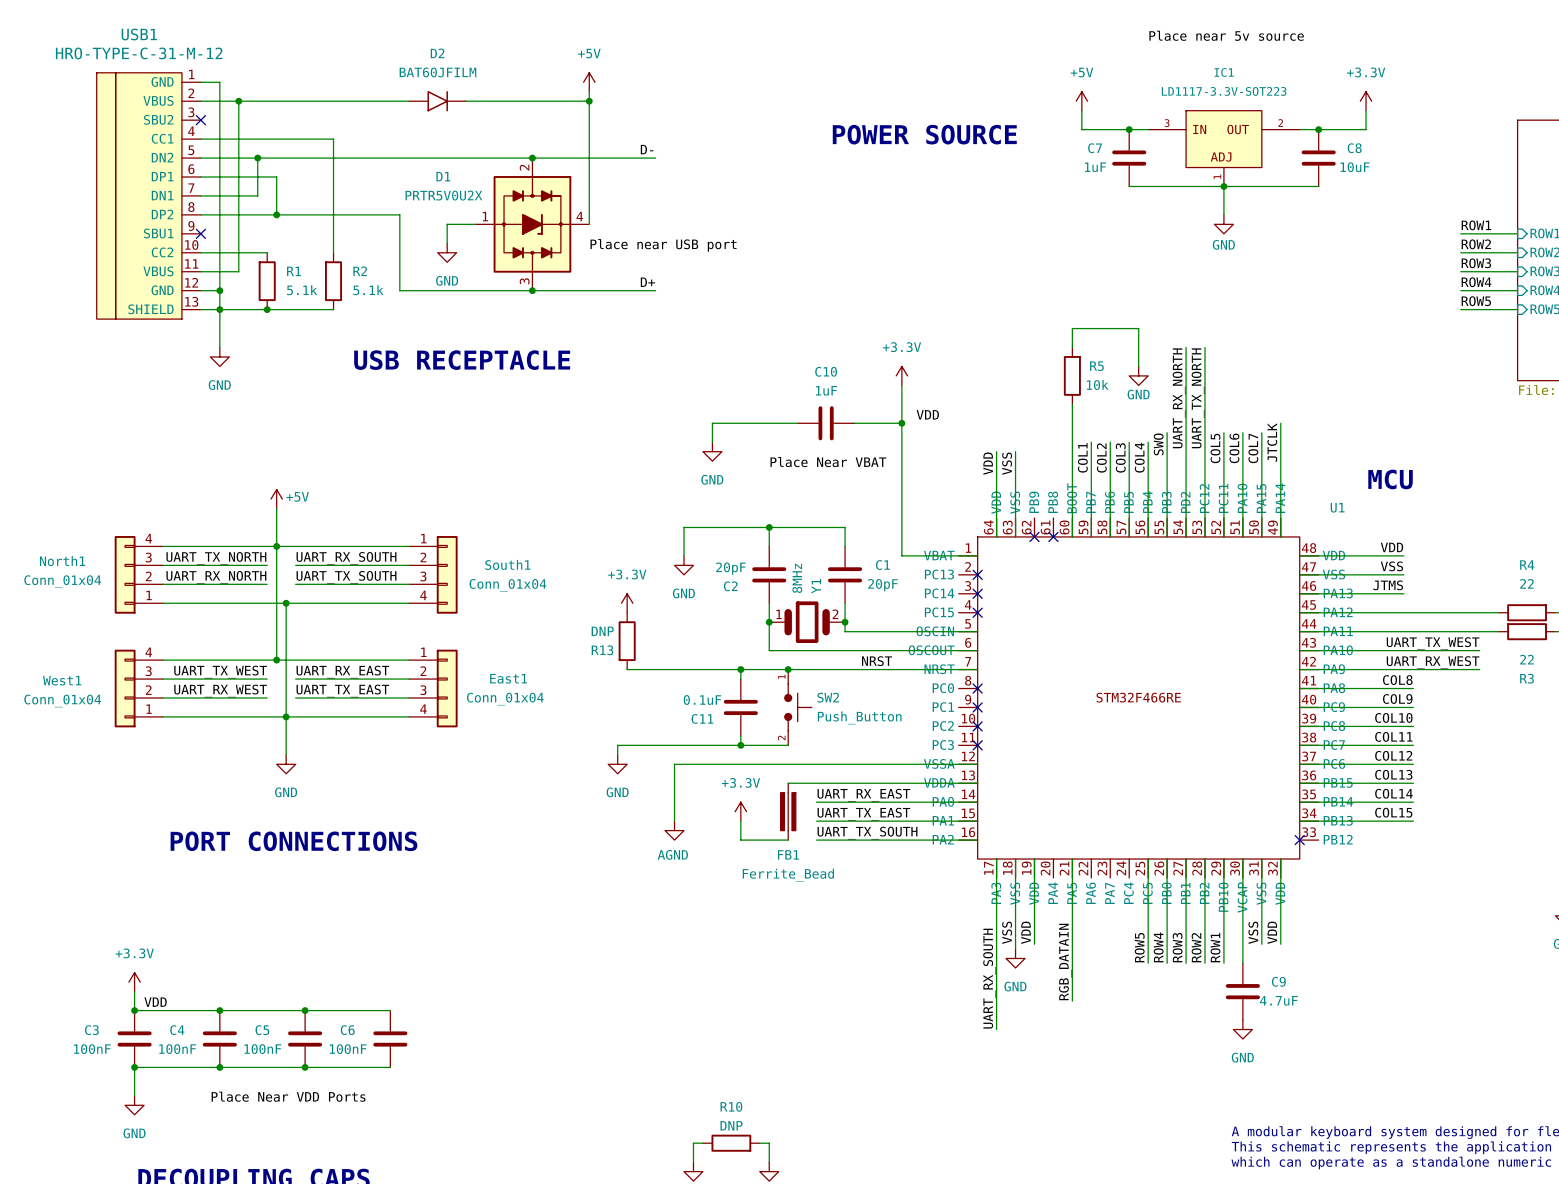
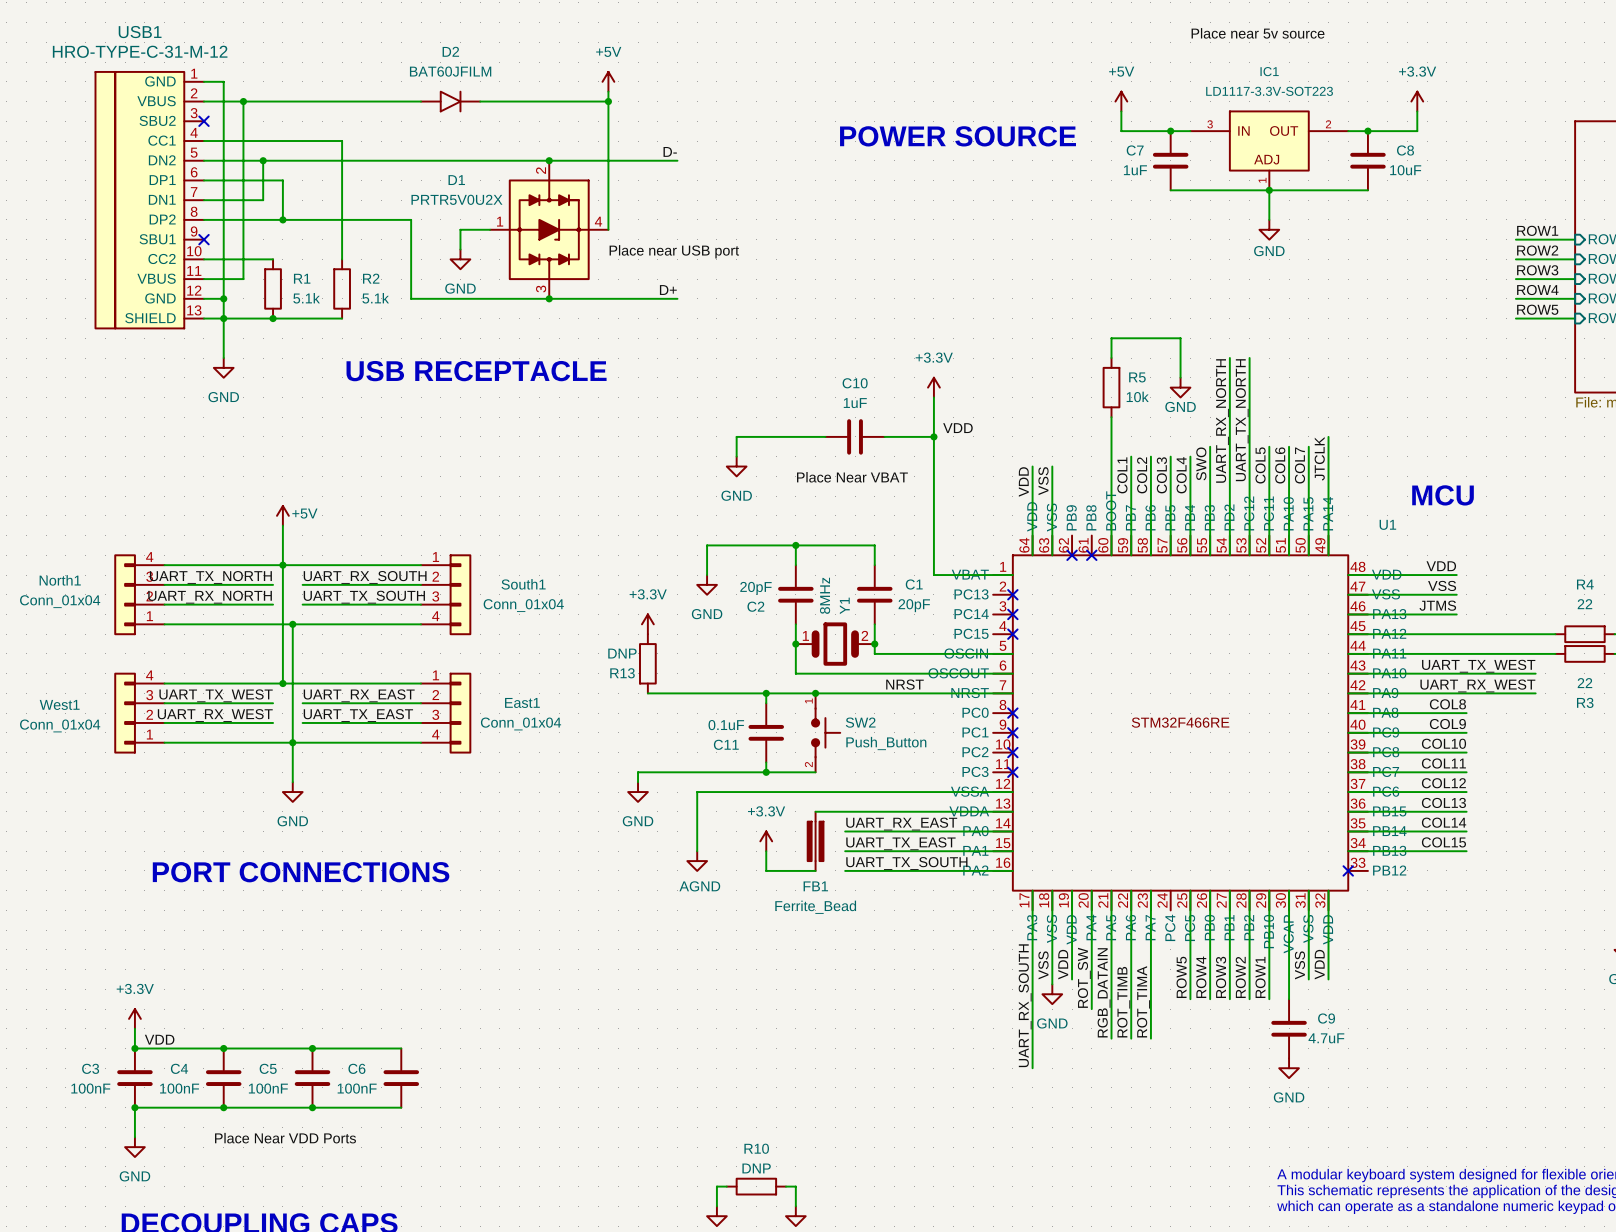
wire: none -> (1091, 890) (1091, 1009)
wire: none -> (1131, 890) (1131, 1038)
wire: none -> (1150, 890) (1150, 1038)
label: none -> ROT_SW (1084, 977)
label: none -> ROT_TIMB (1123, 1002)
label: none -> ROT_TIMA (1143, 1001)

